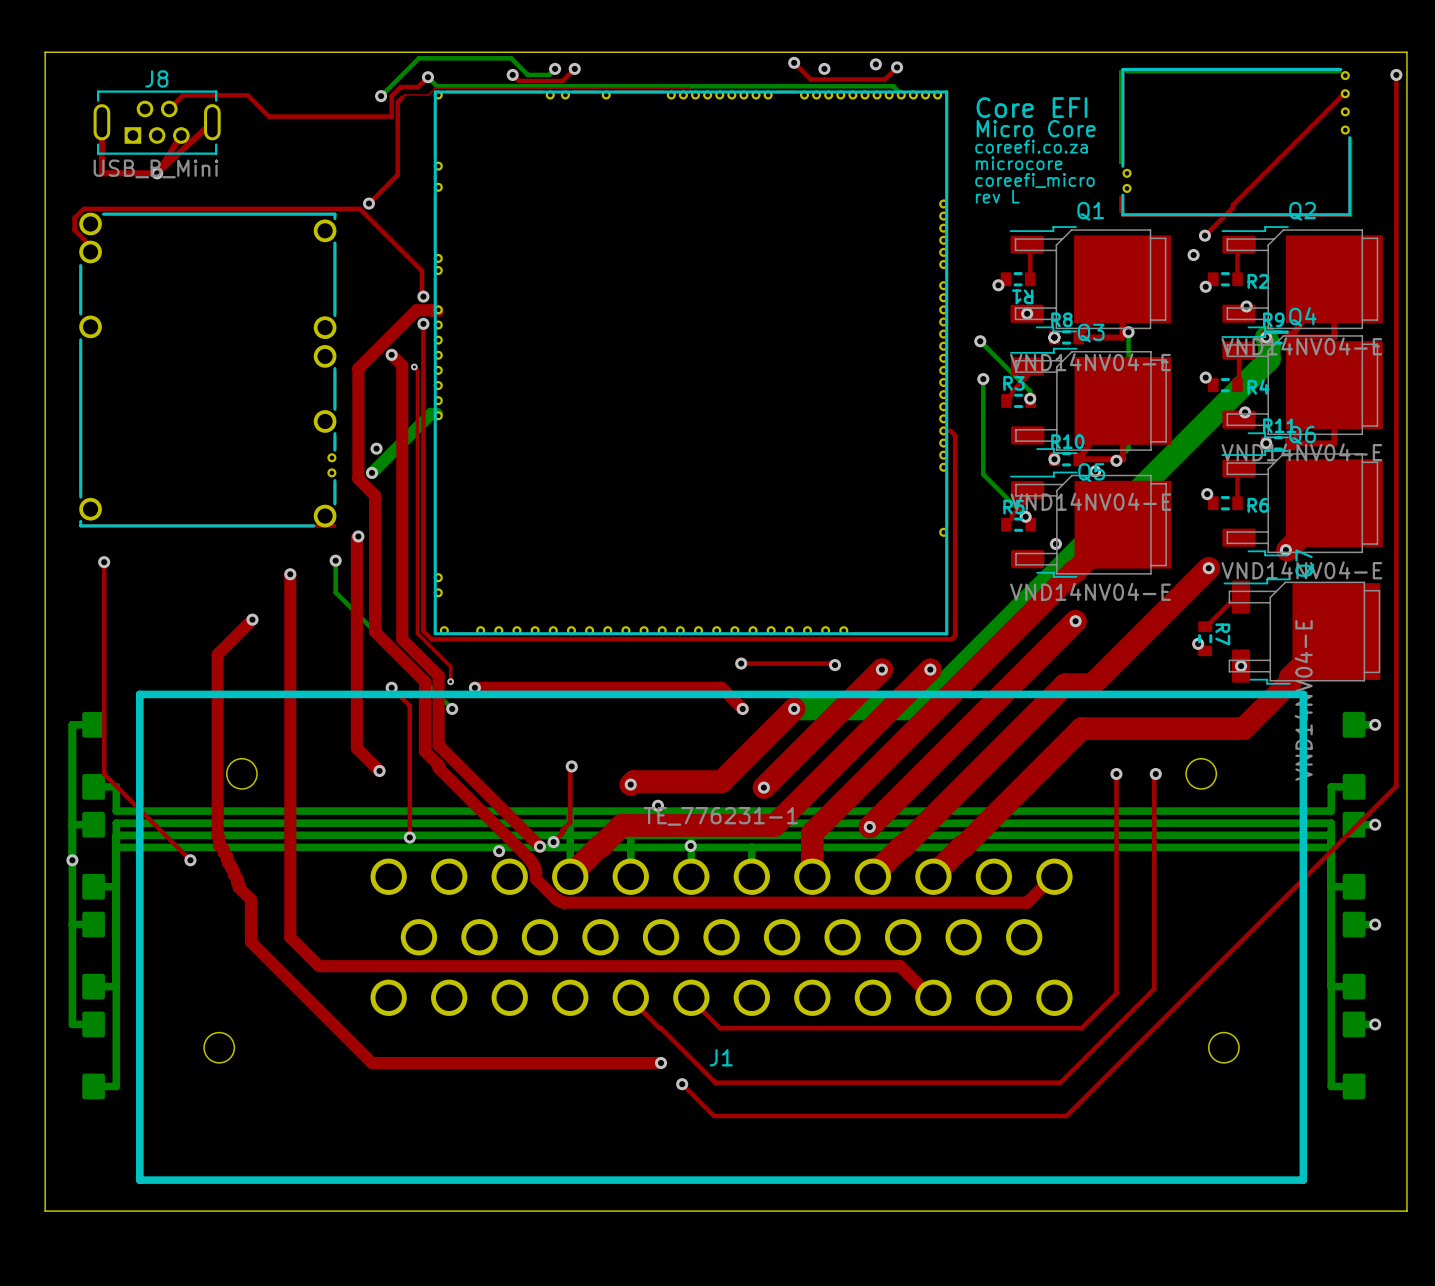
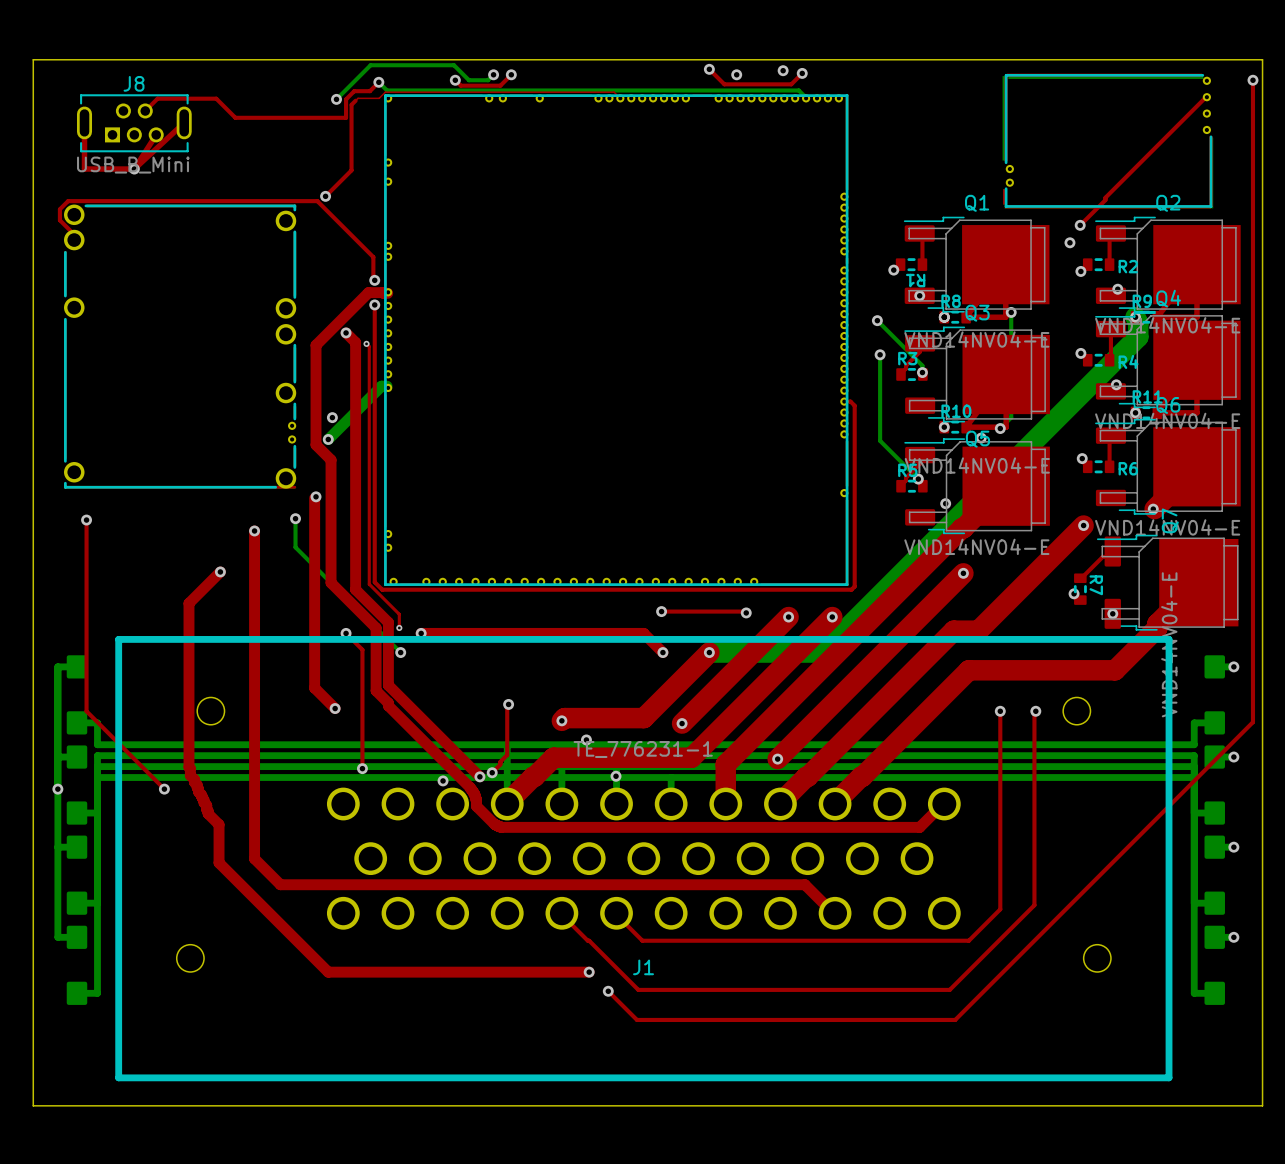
text: Core EFI (1031, 107) -> none
text: Micro Core (1036, 128) -> none
text: coreefi.co.za (1031, 146) -> none
text: microcore (1019, 163) -> none
text: coreefi_micro (1034, 180) -> none
text: rev L (997, 196) -> none

